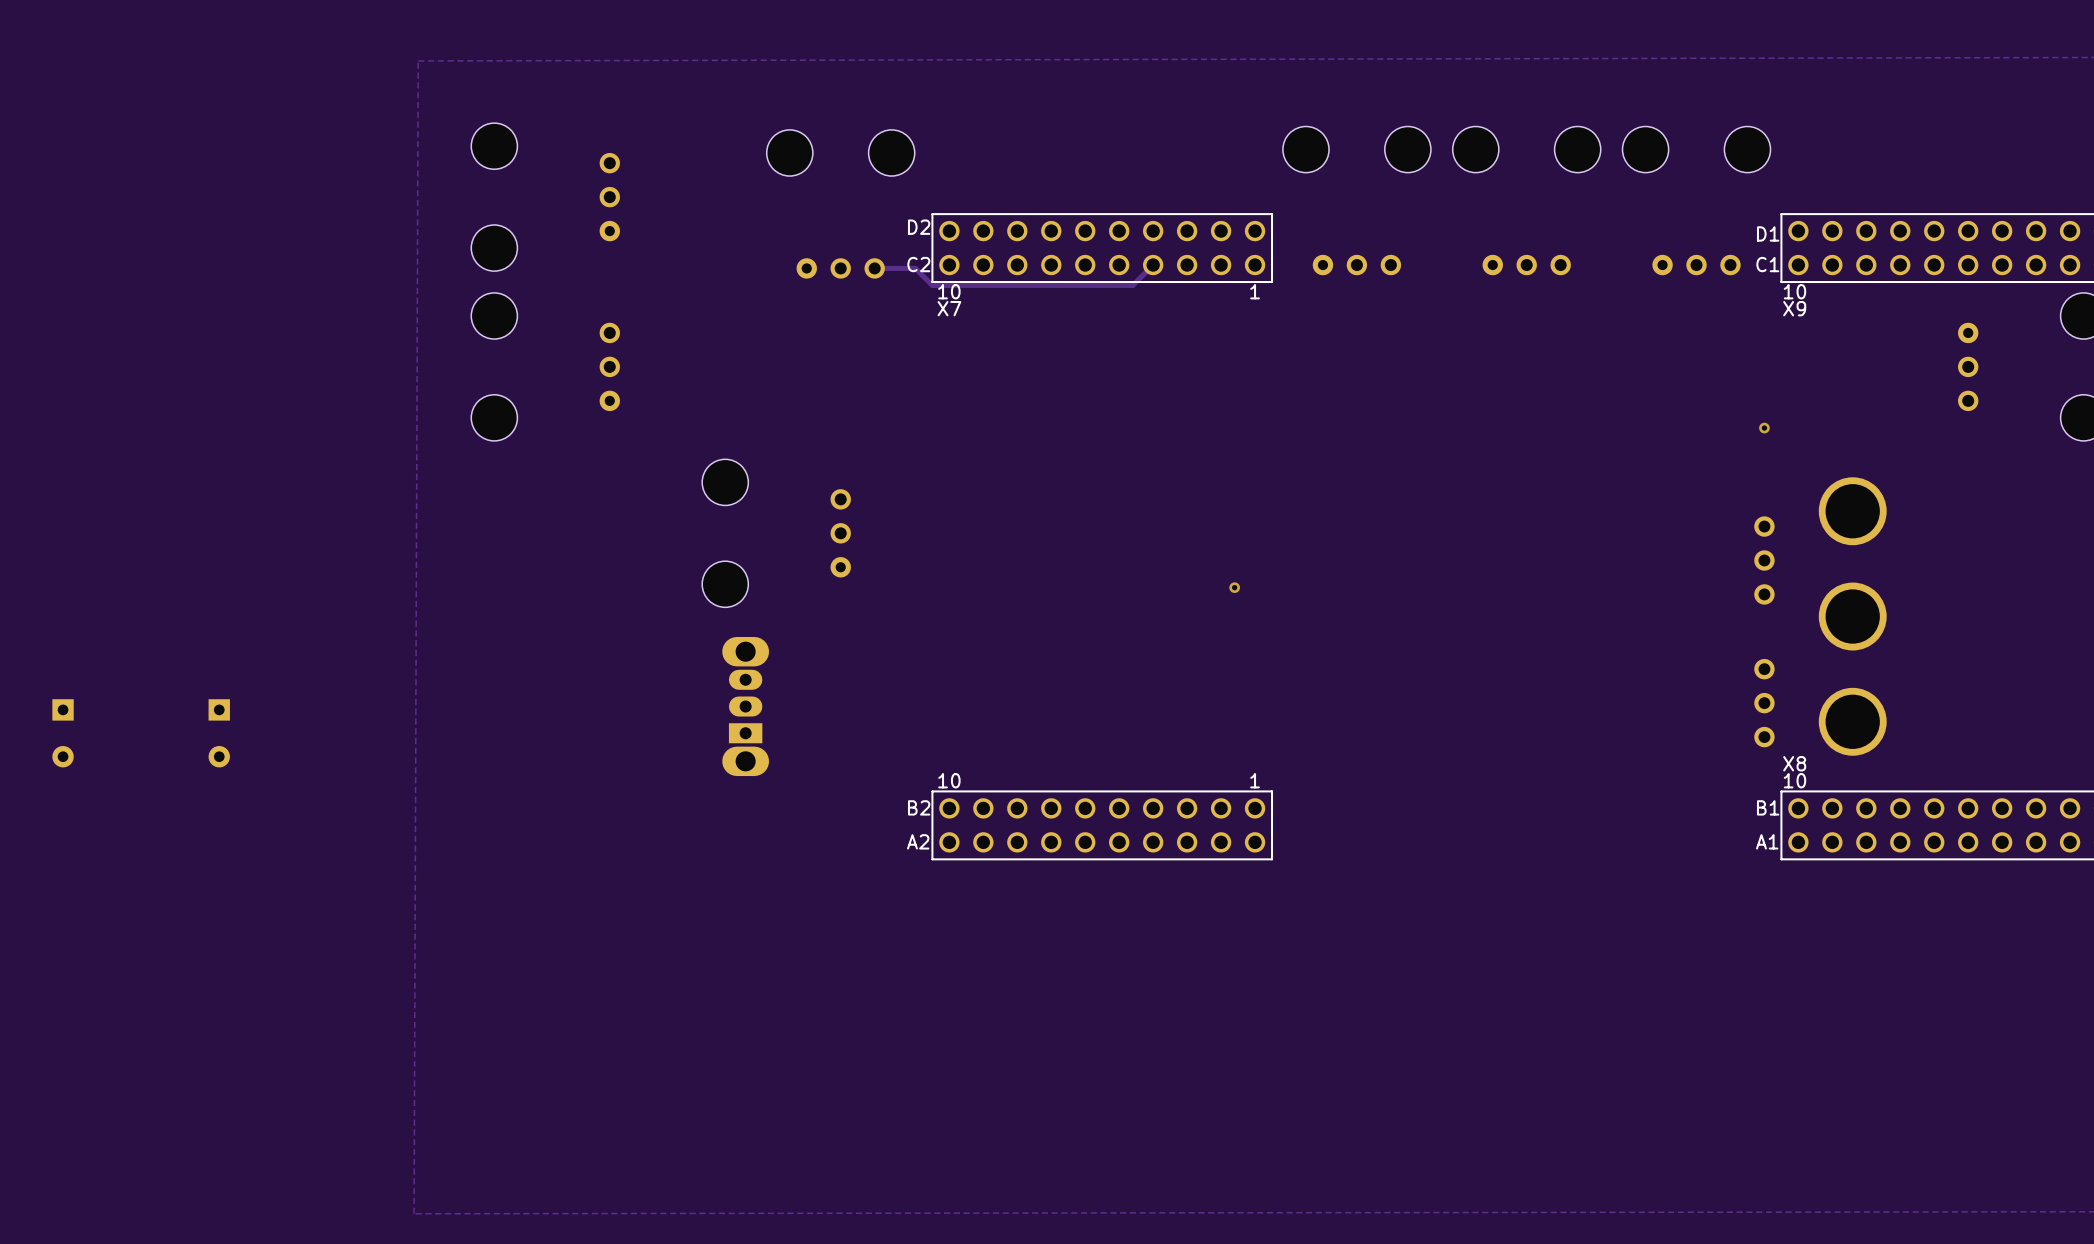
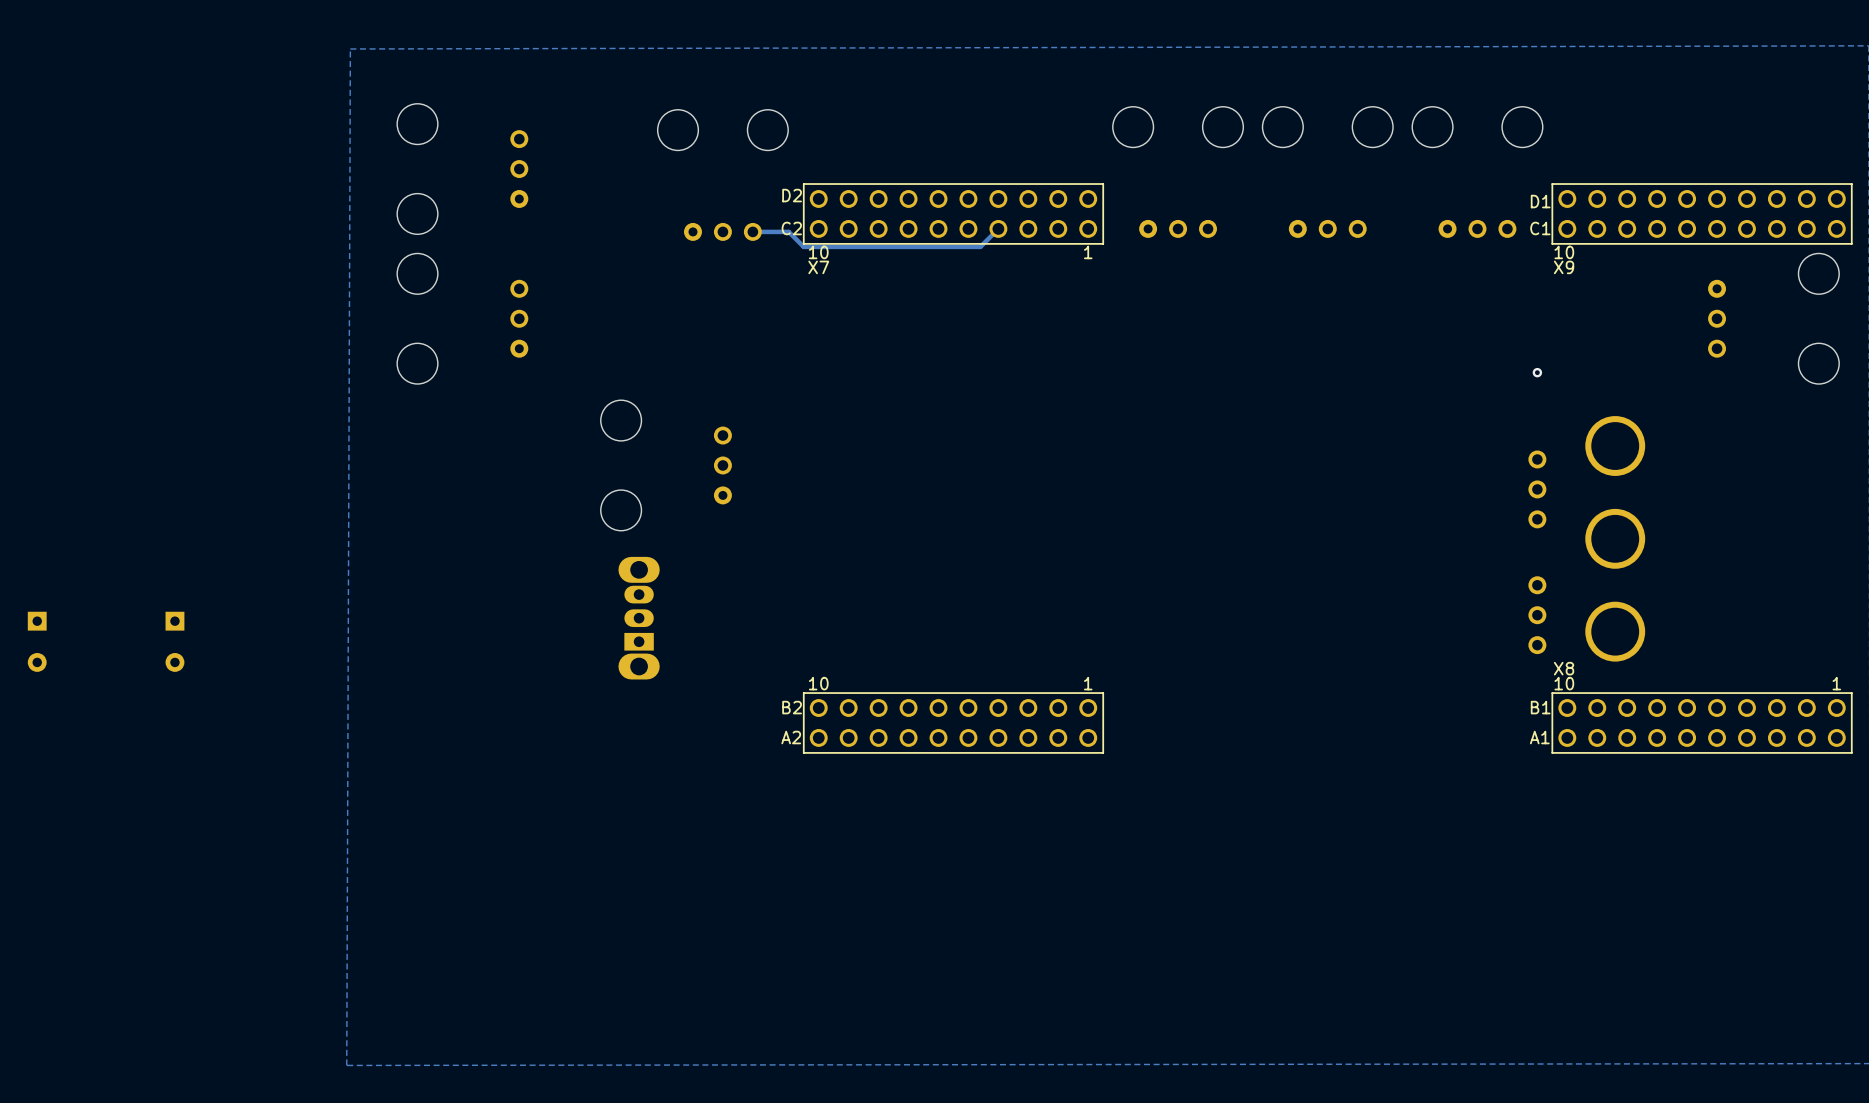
via: (1234, 587) -> none

